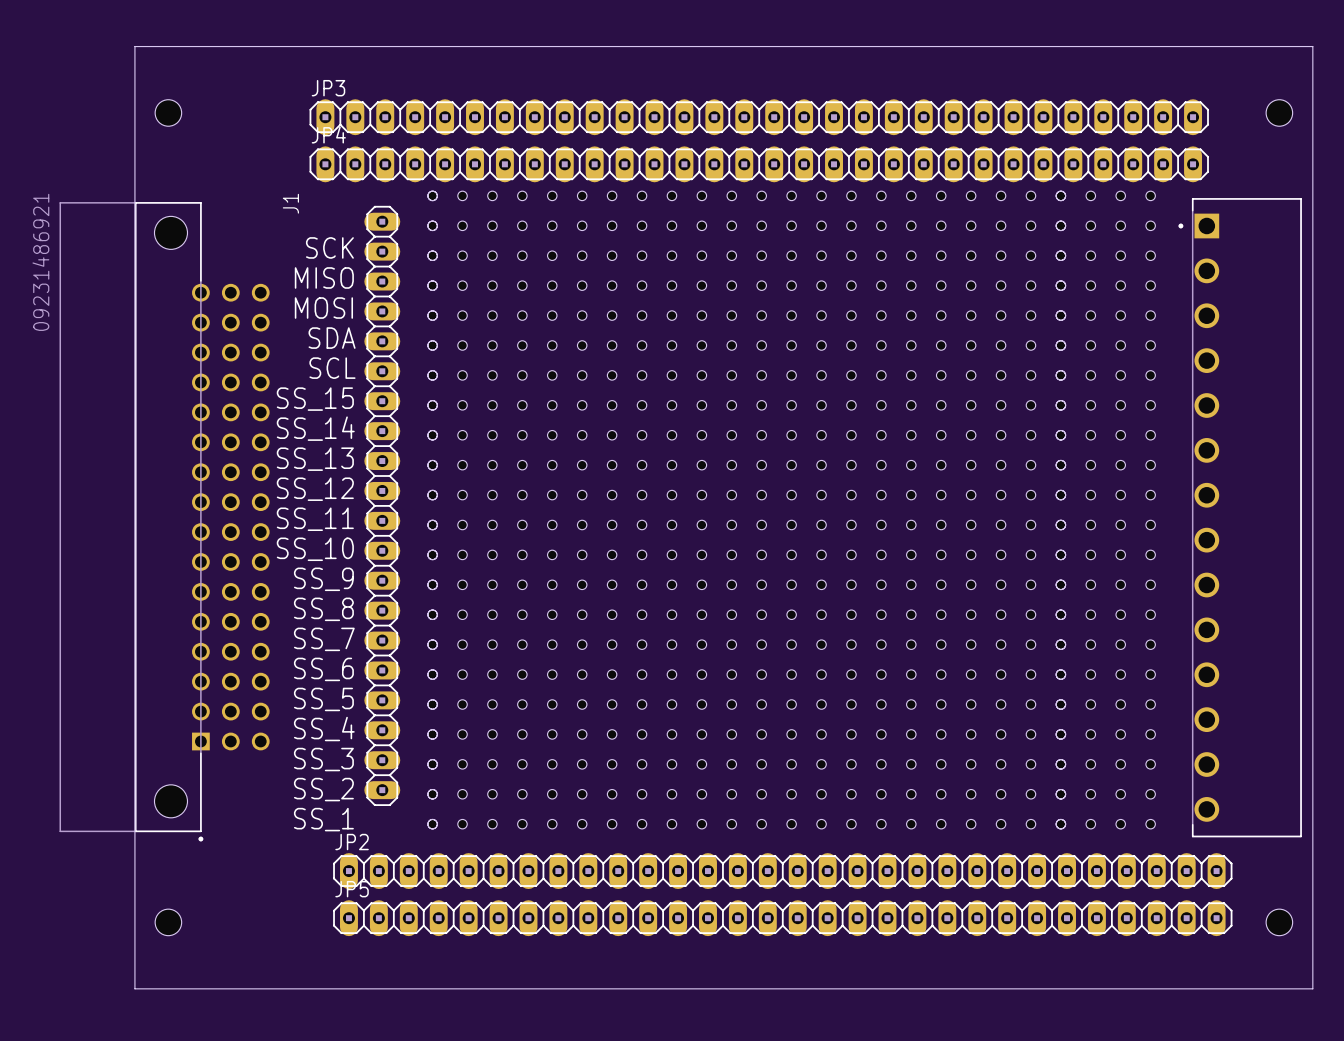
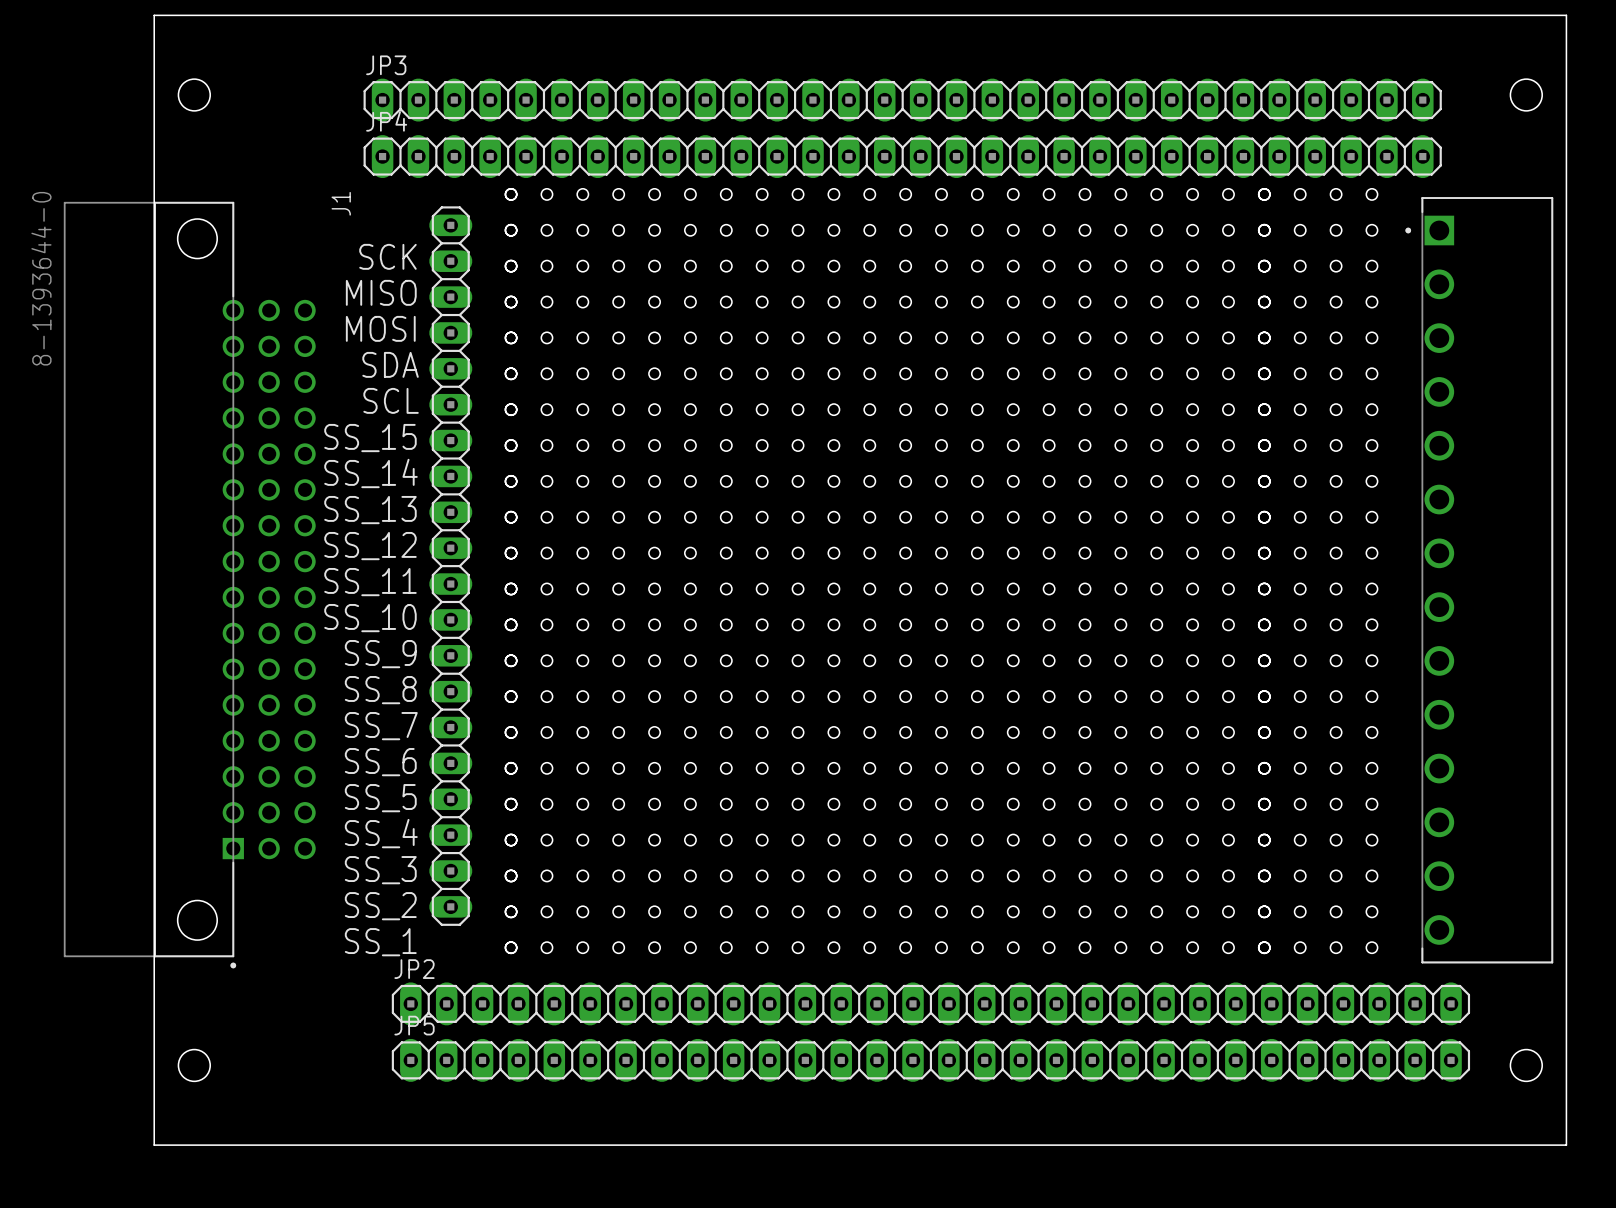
J1 value: 09231486921 (40, 262) -> 8-1393644-0 (41, 278)

